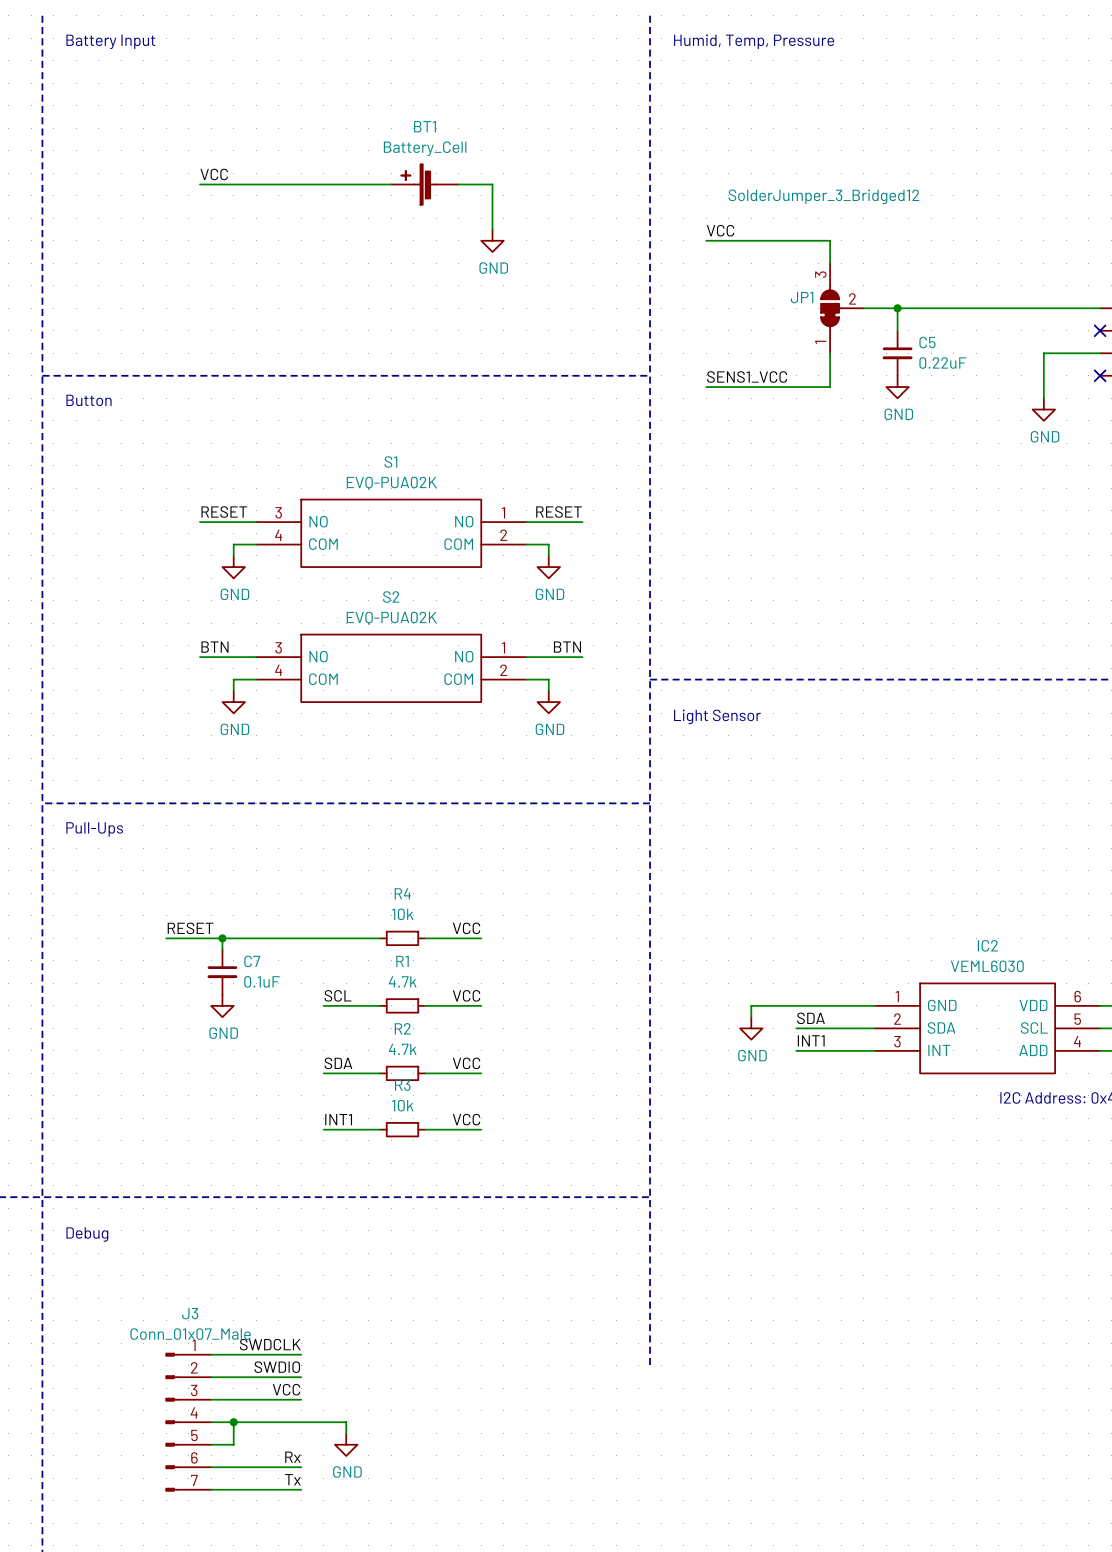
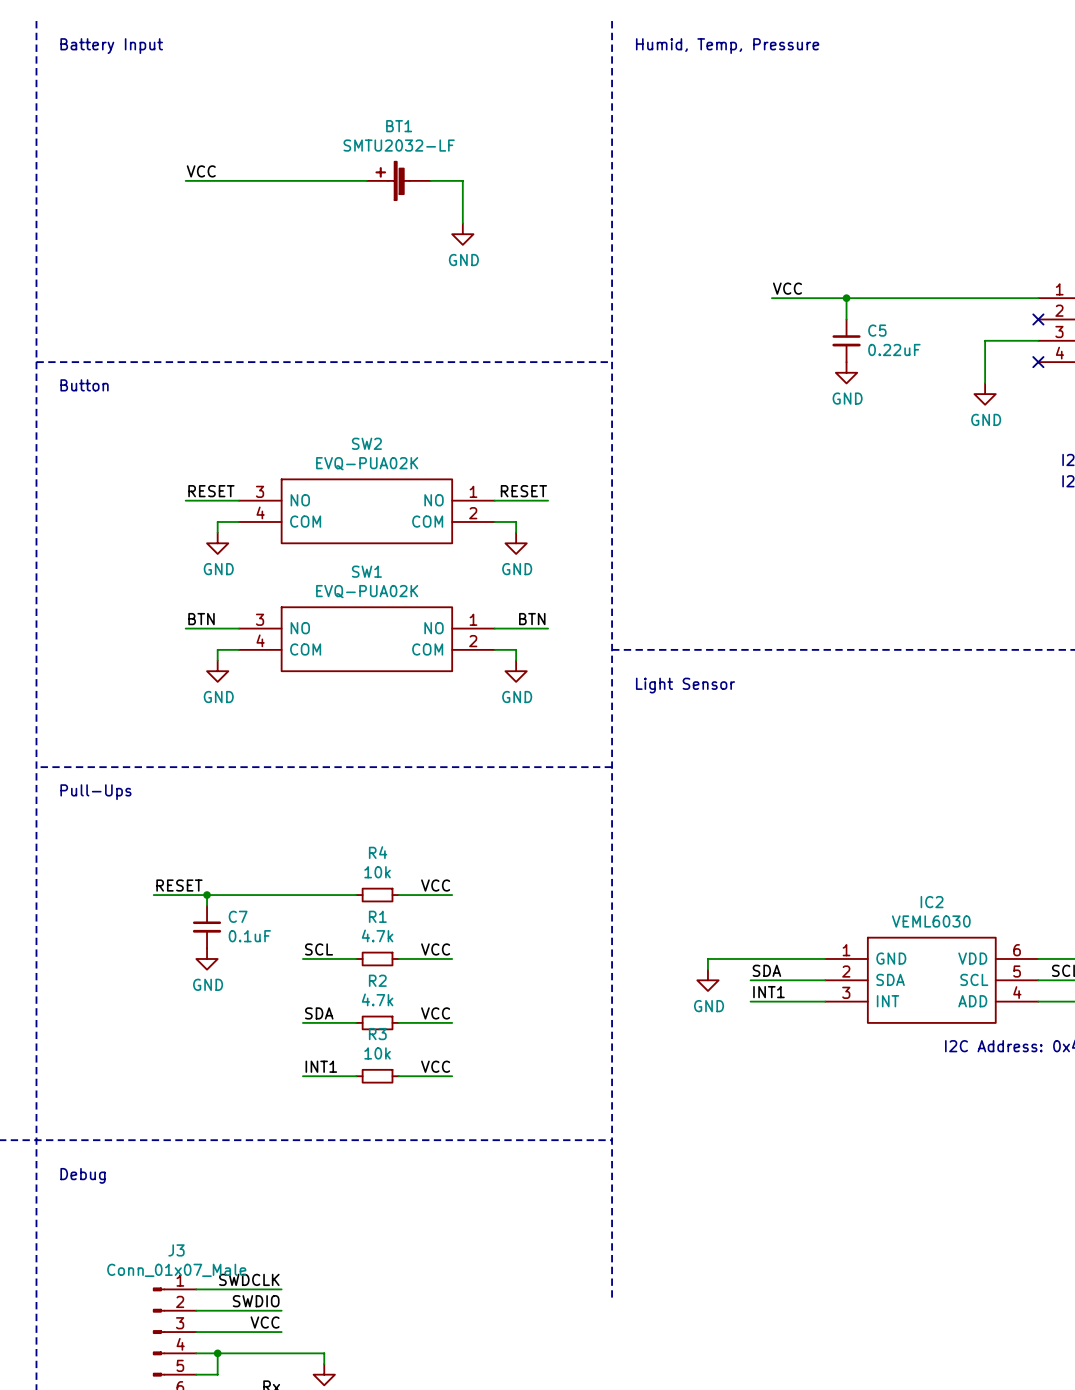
BT1 value: Battery_Cell (425, 148) -> SMTU2032-LF (399, 145)
label position: VCC (720, 230) -> VCC (787, 288)
wire: (706, 240) (830, 240) (830, 263) -> none
JP1: SolderJumper_3_Bridged12 (842, 308) -> none
wire: (830, 353) (830, 387) (706, 387) -> none
label: SENS1_VCC (747, 377) -> none
S1 name: S1 (390, 462) -> SW2 (366, 443)
S2 name: S2 (391, 597) -> SW1 (366, 571)

